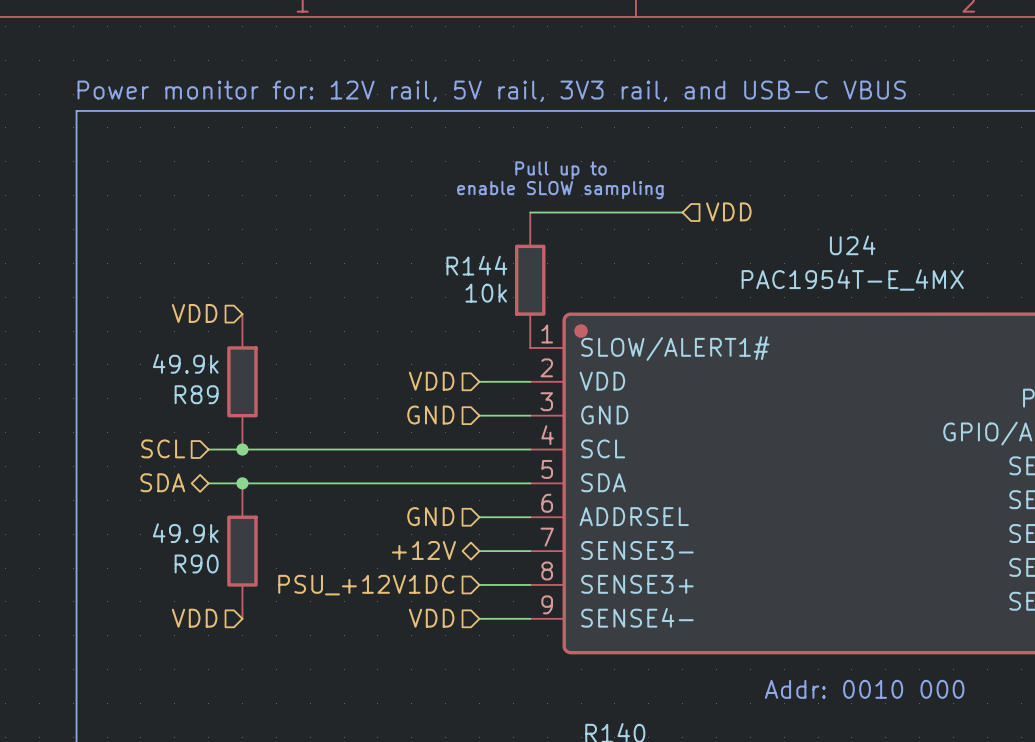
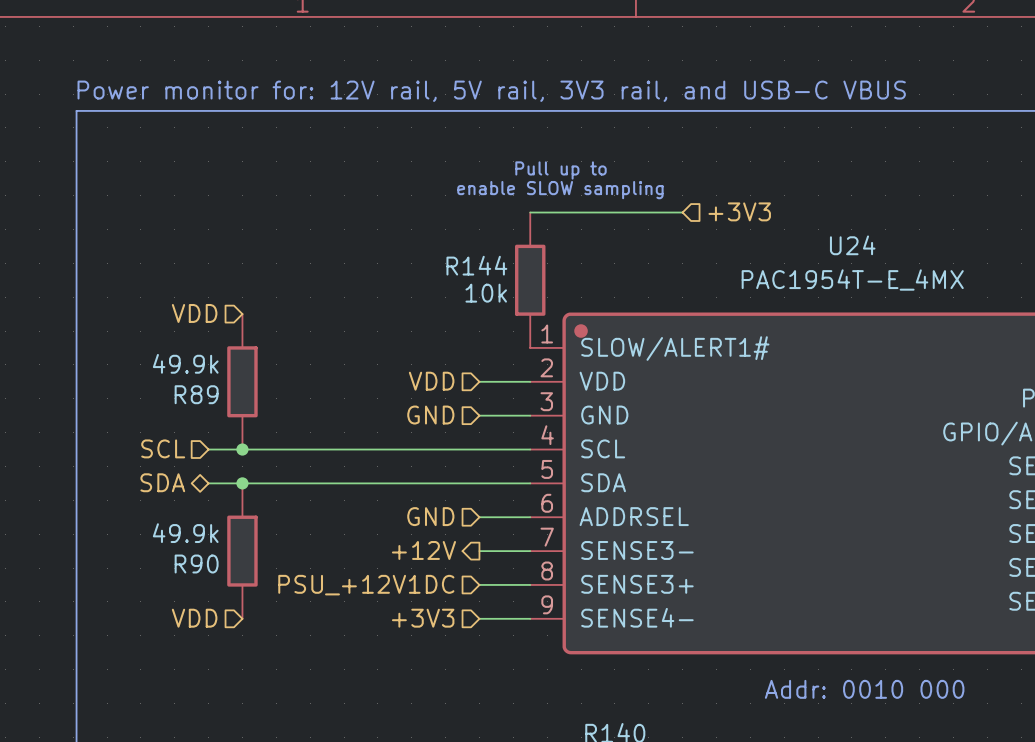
hierarchical label: VDD (728, 211) -> +3V3 (739, 211)
hierarchical label shape: bidirectional (423, 550) -> output (423, 550)
hierarchical label: VDD (431, 618) -> +3V3 (423, 618)

